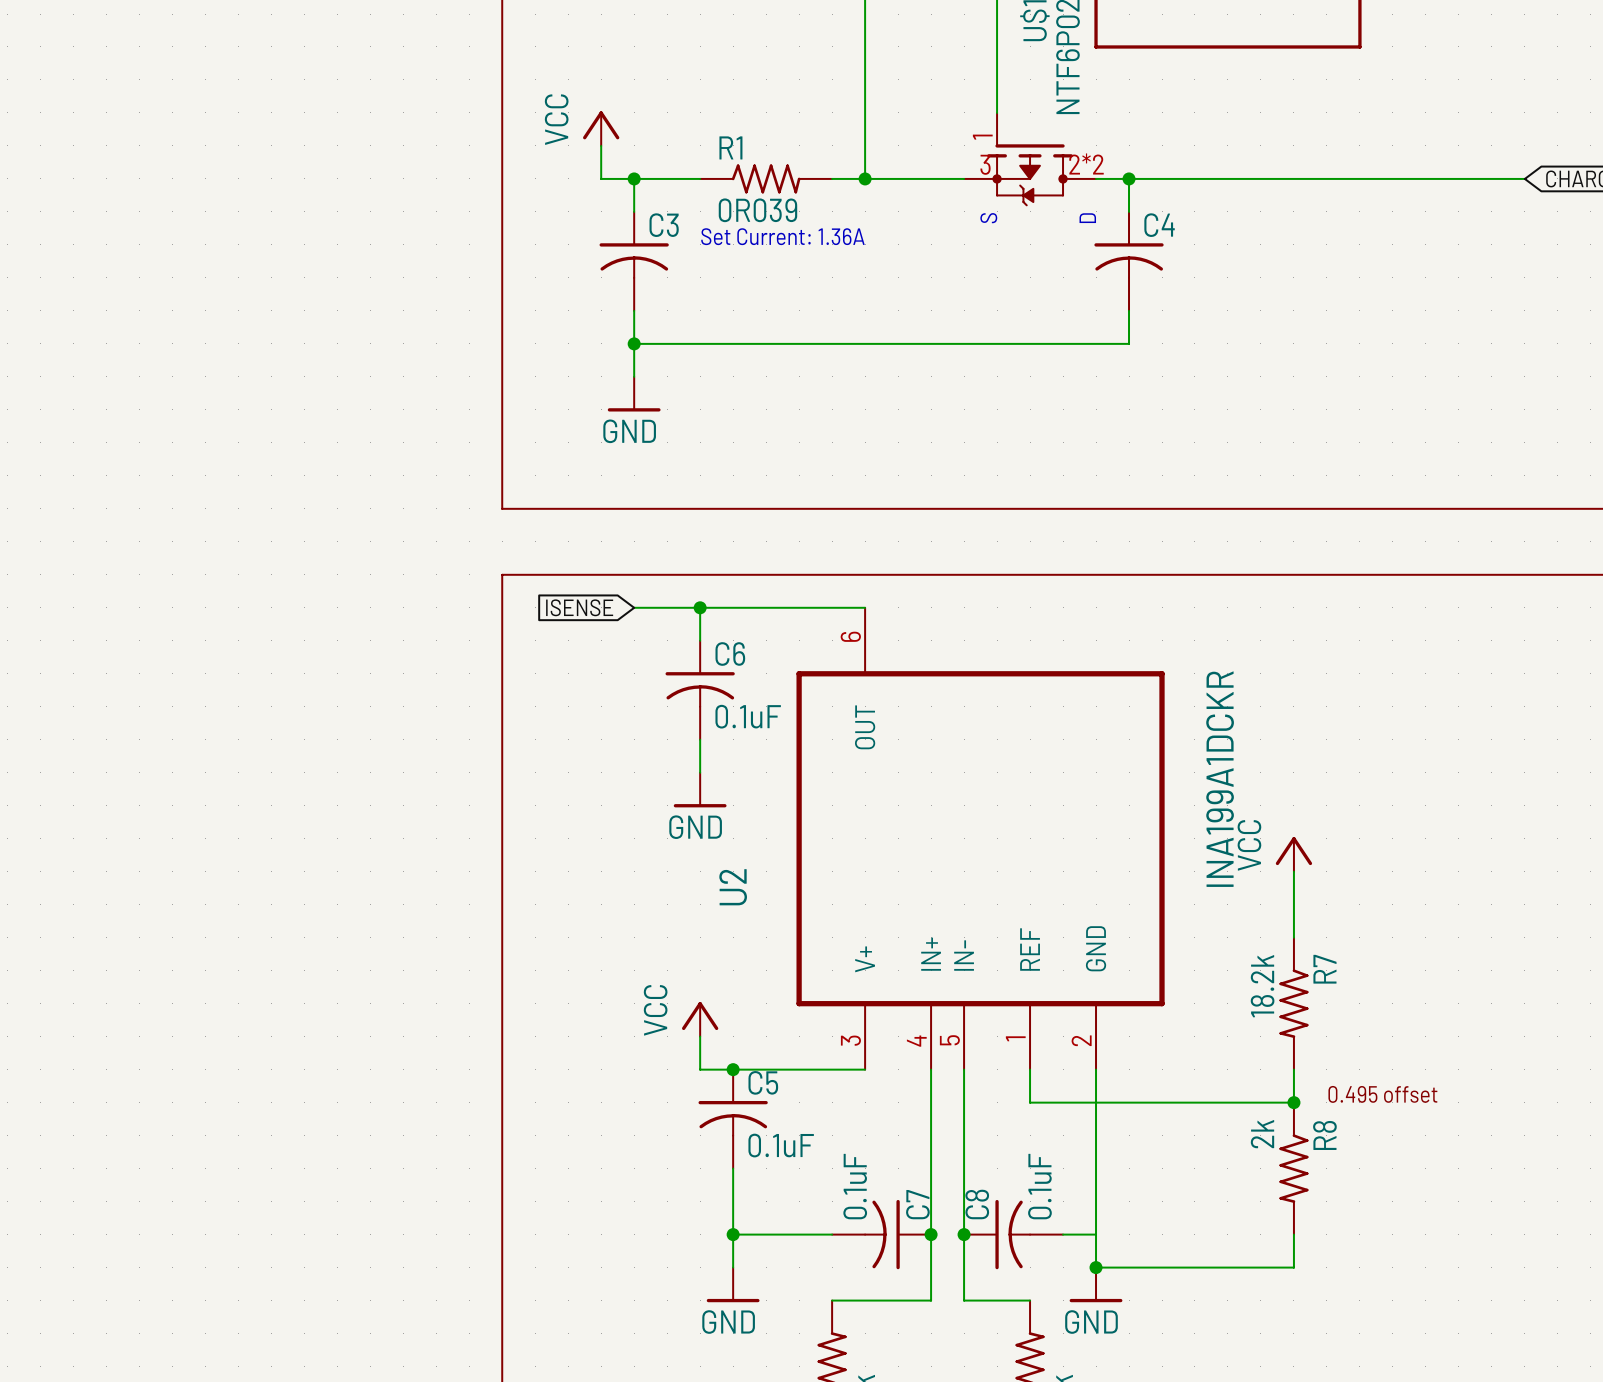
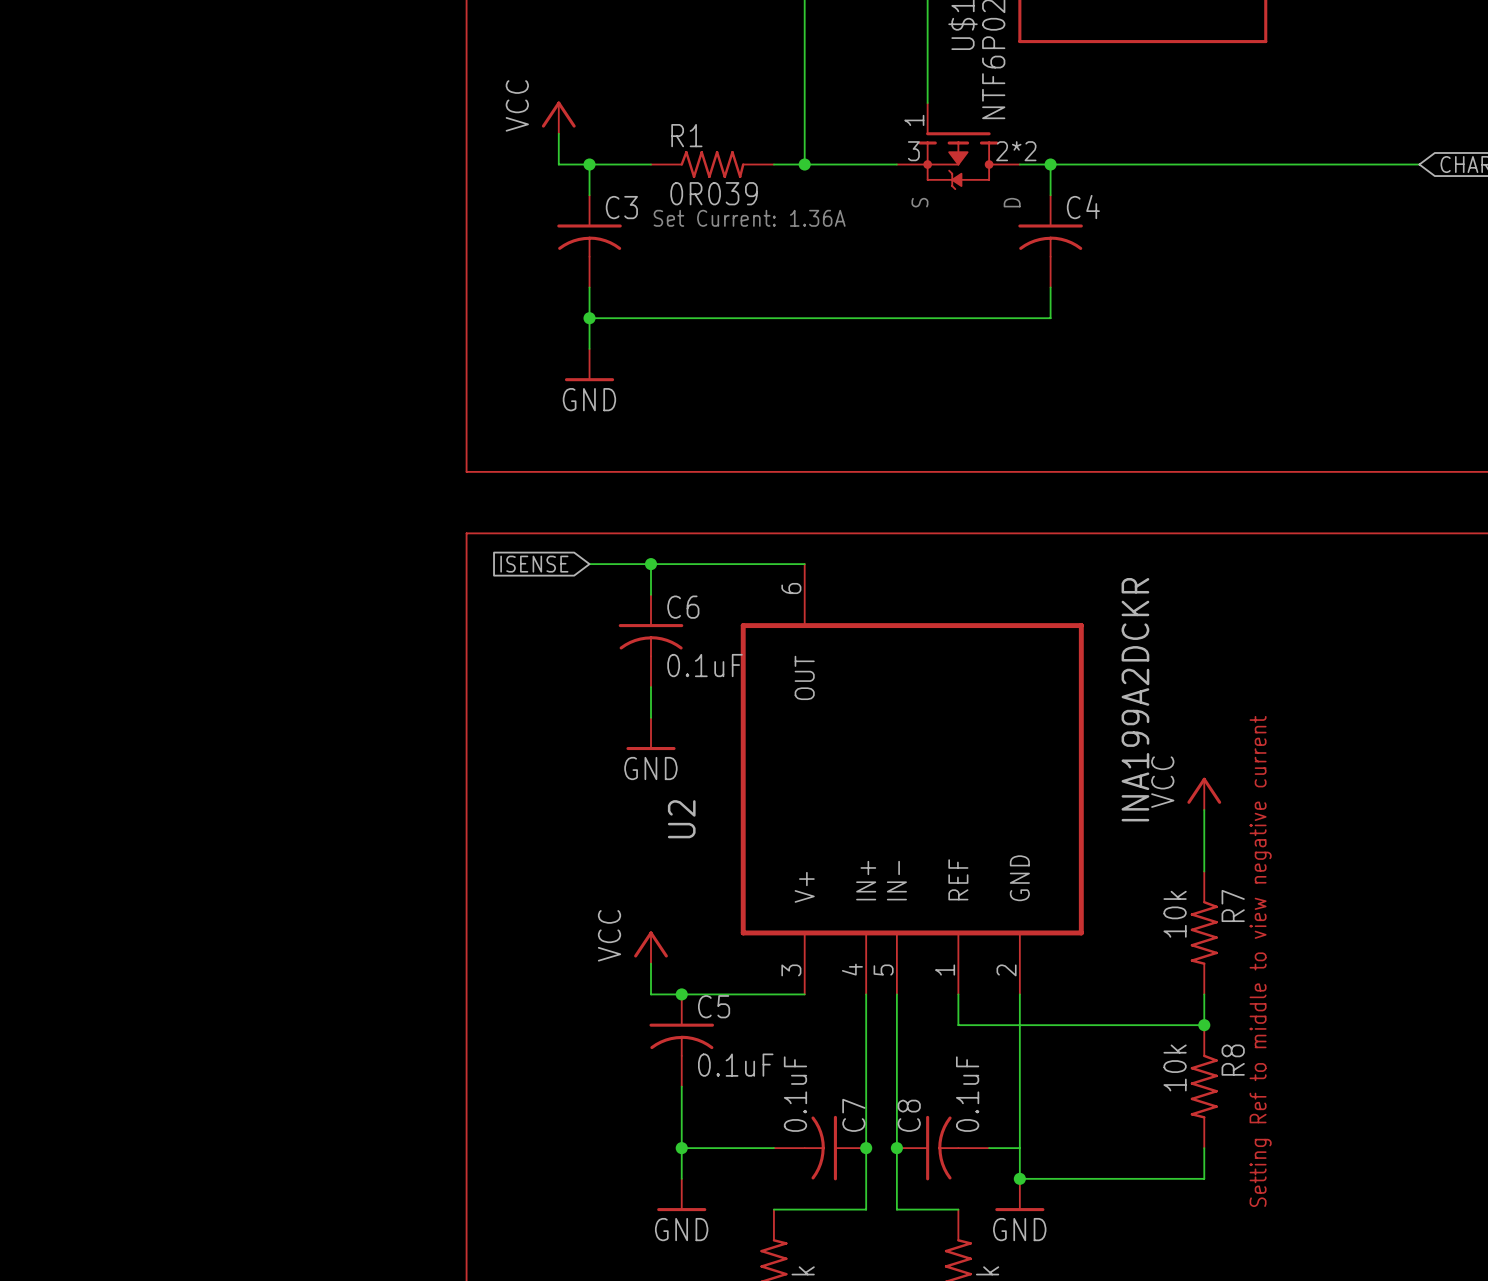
U2 value: INA199A1DCKR (1220, 779) -> INA199A2DCKR (1135, 699)
R7 value: 18.2k (1262, 986) -> 10k (1175, 914)
text: none -> Setting Ref to middle to view negative current (1260, 961)
text: 0.495 offset (1382, 1094) -> none
R8 value: 2k (1262, 1134) -> 10k (1175, 1067)

